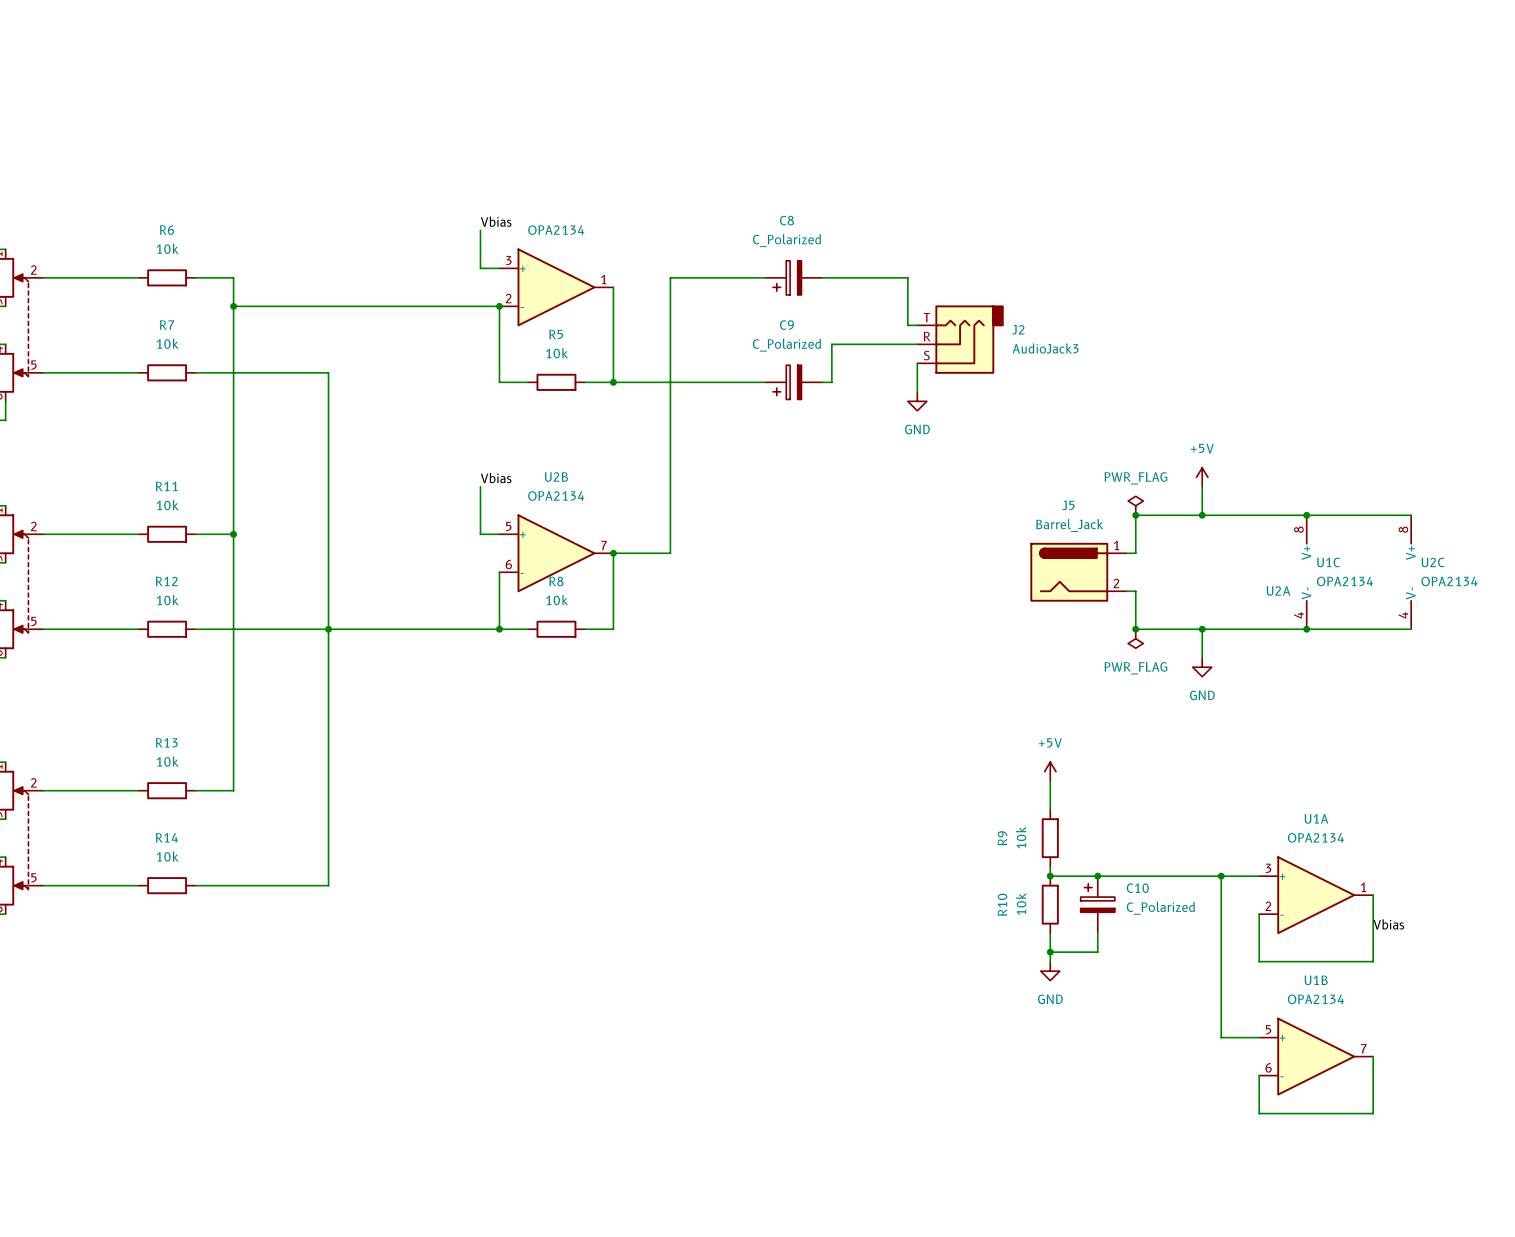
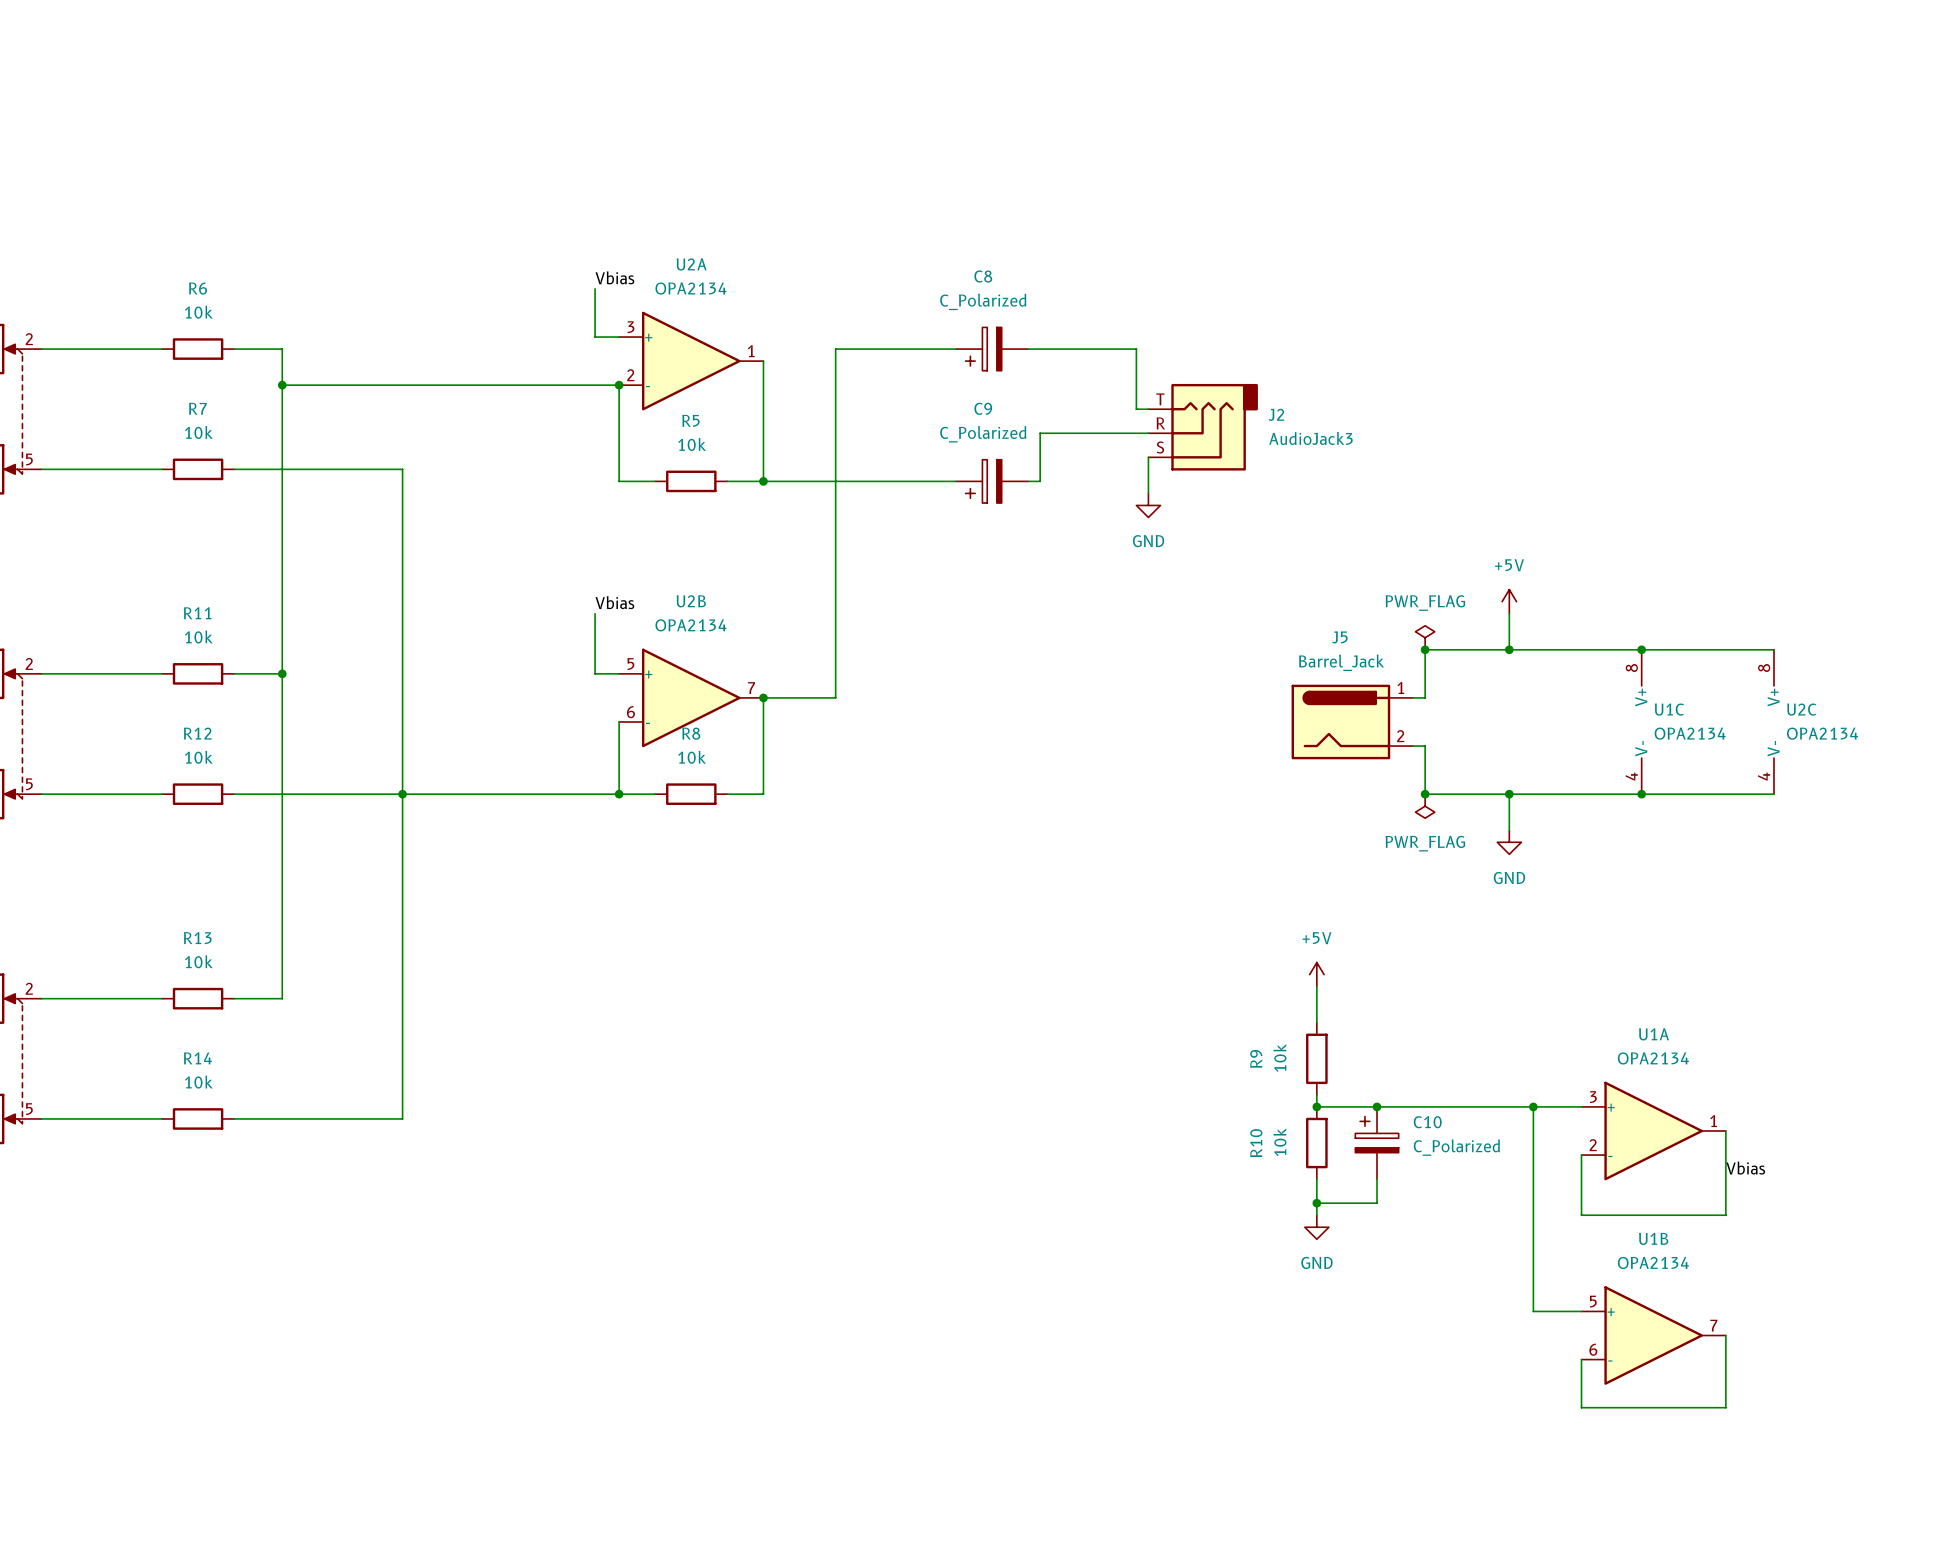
U2A name position: U2A (1278, 590) -> U2A (691, 264)

